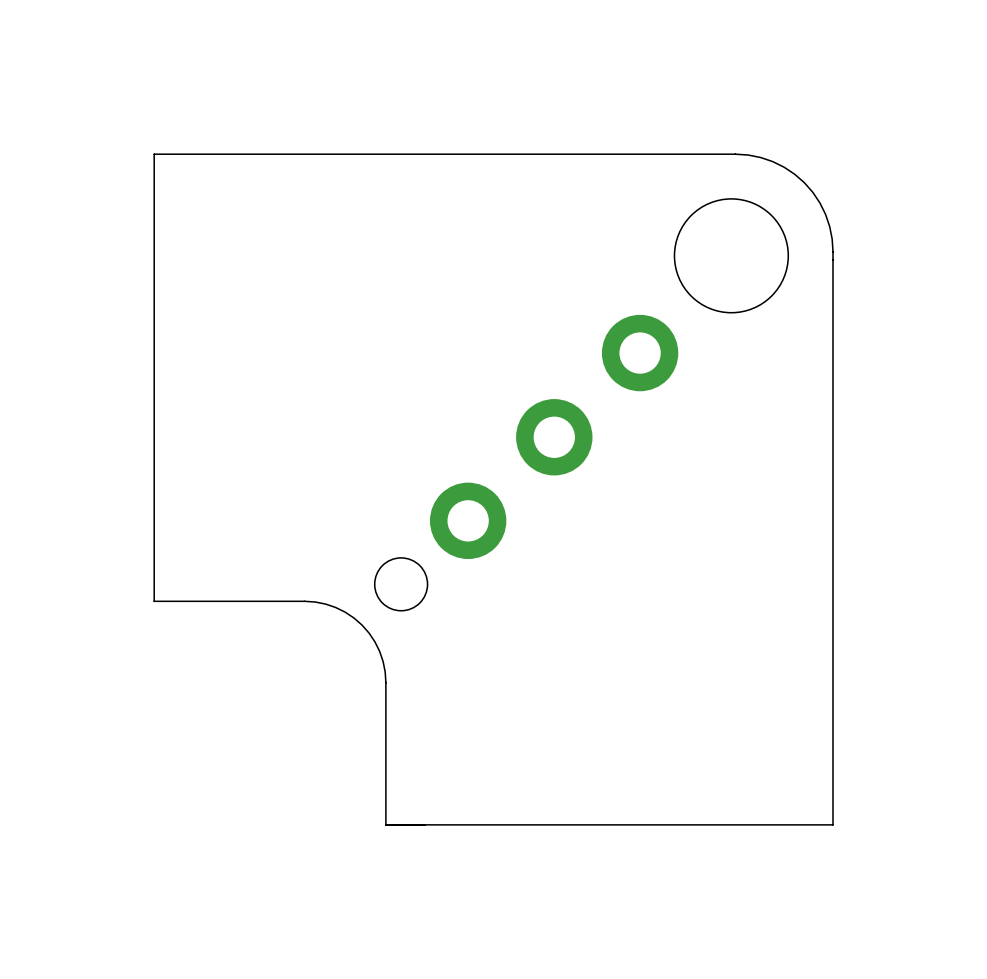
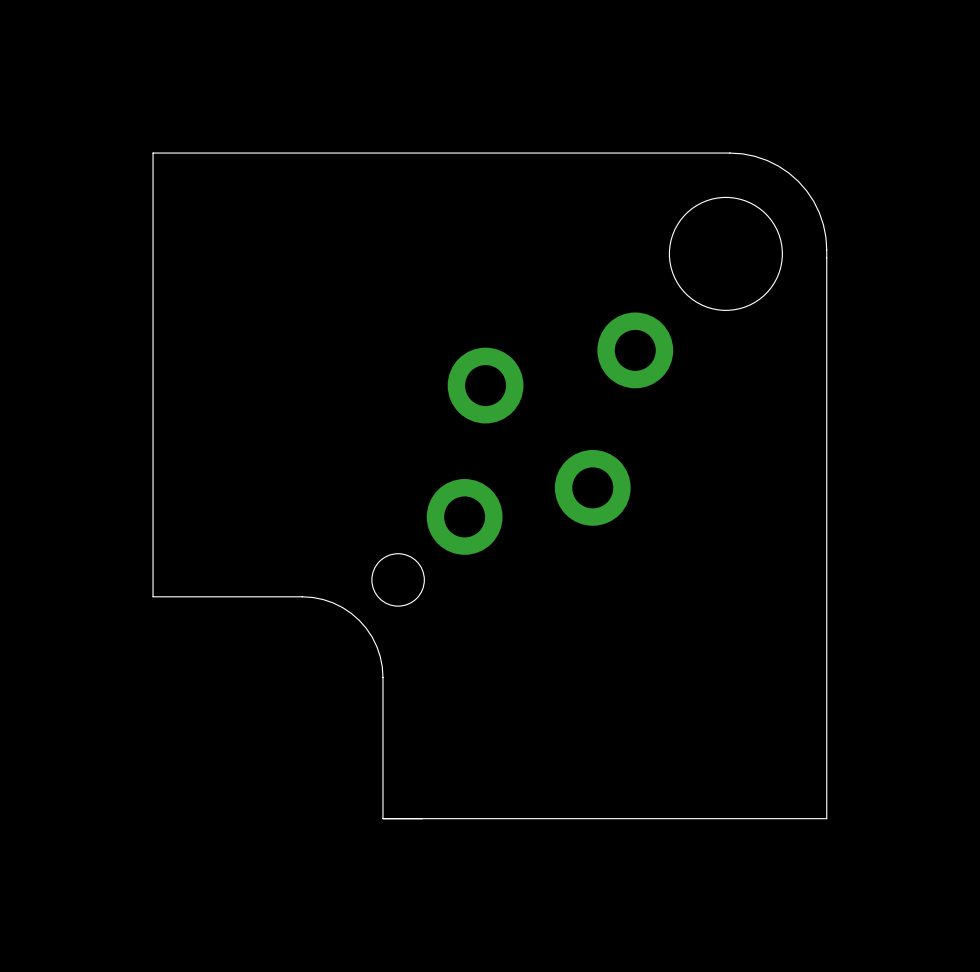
part: none -> (485, 385)
part: (554, 437) -> none
part: none -> (592, 487)

